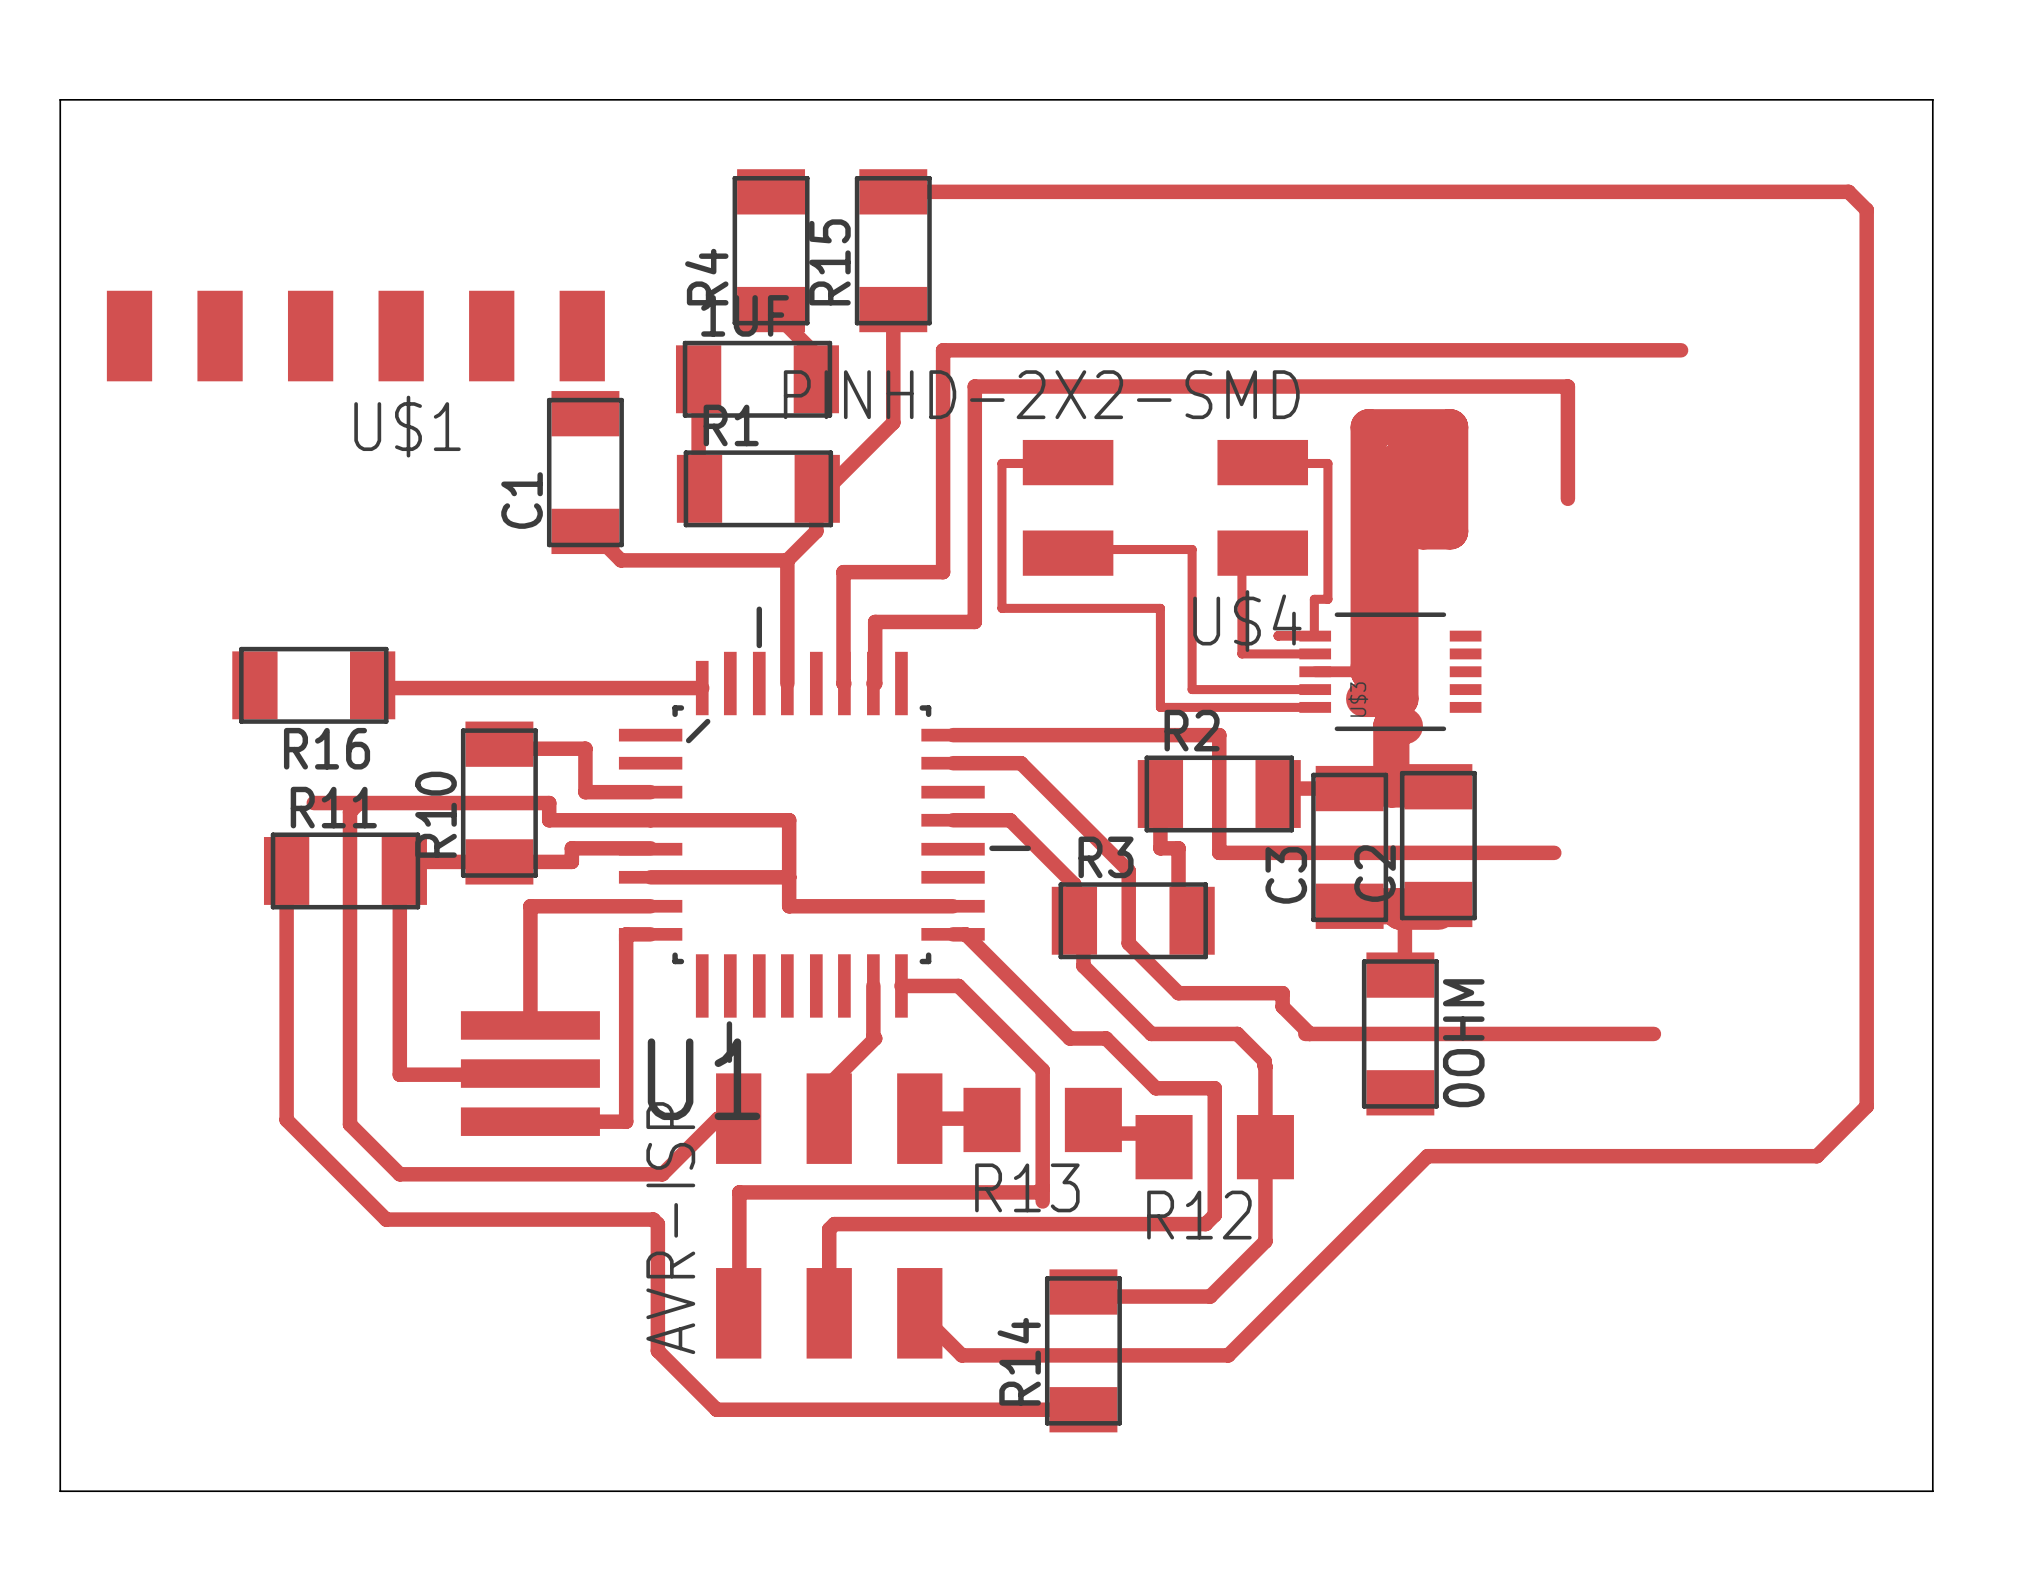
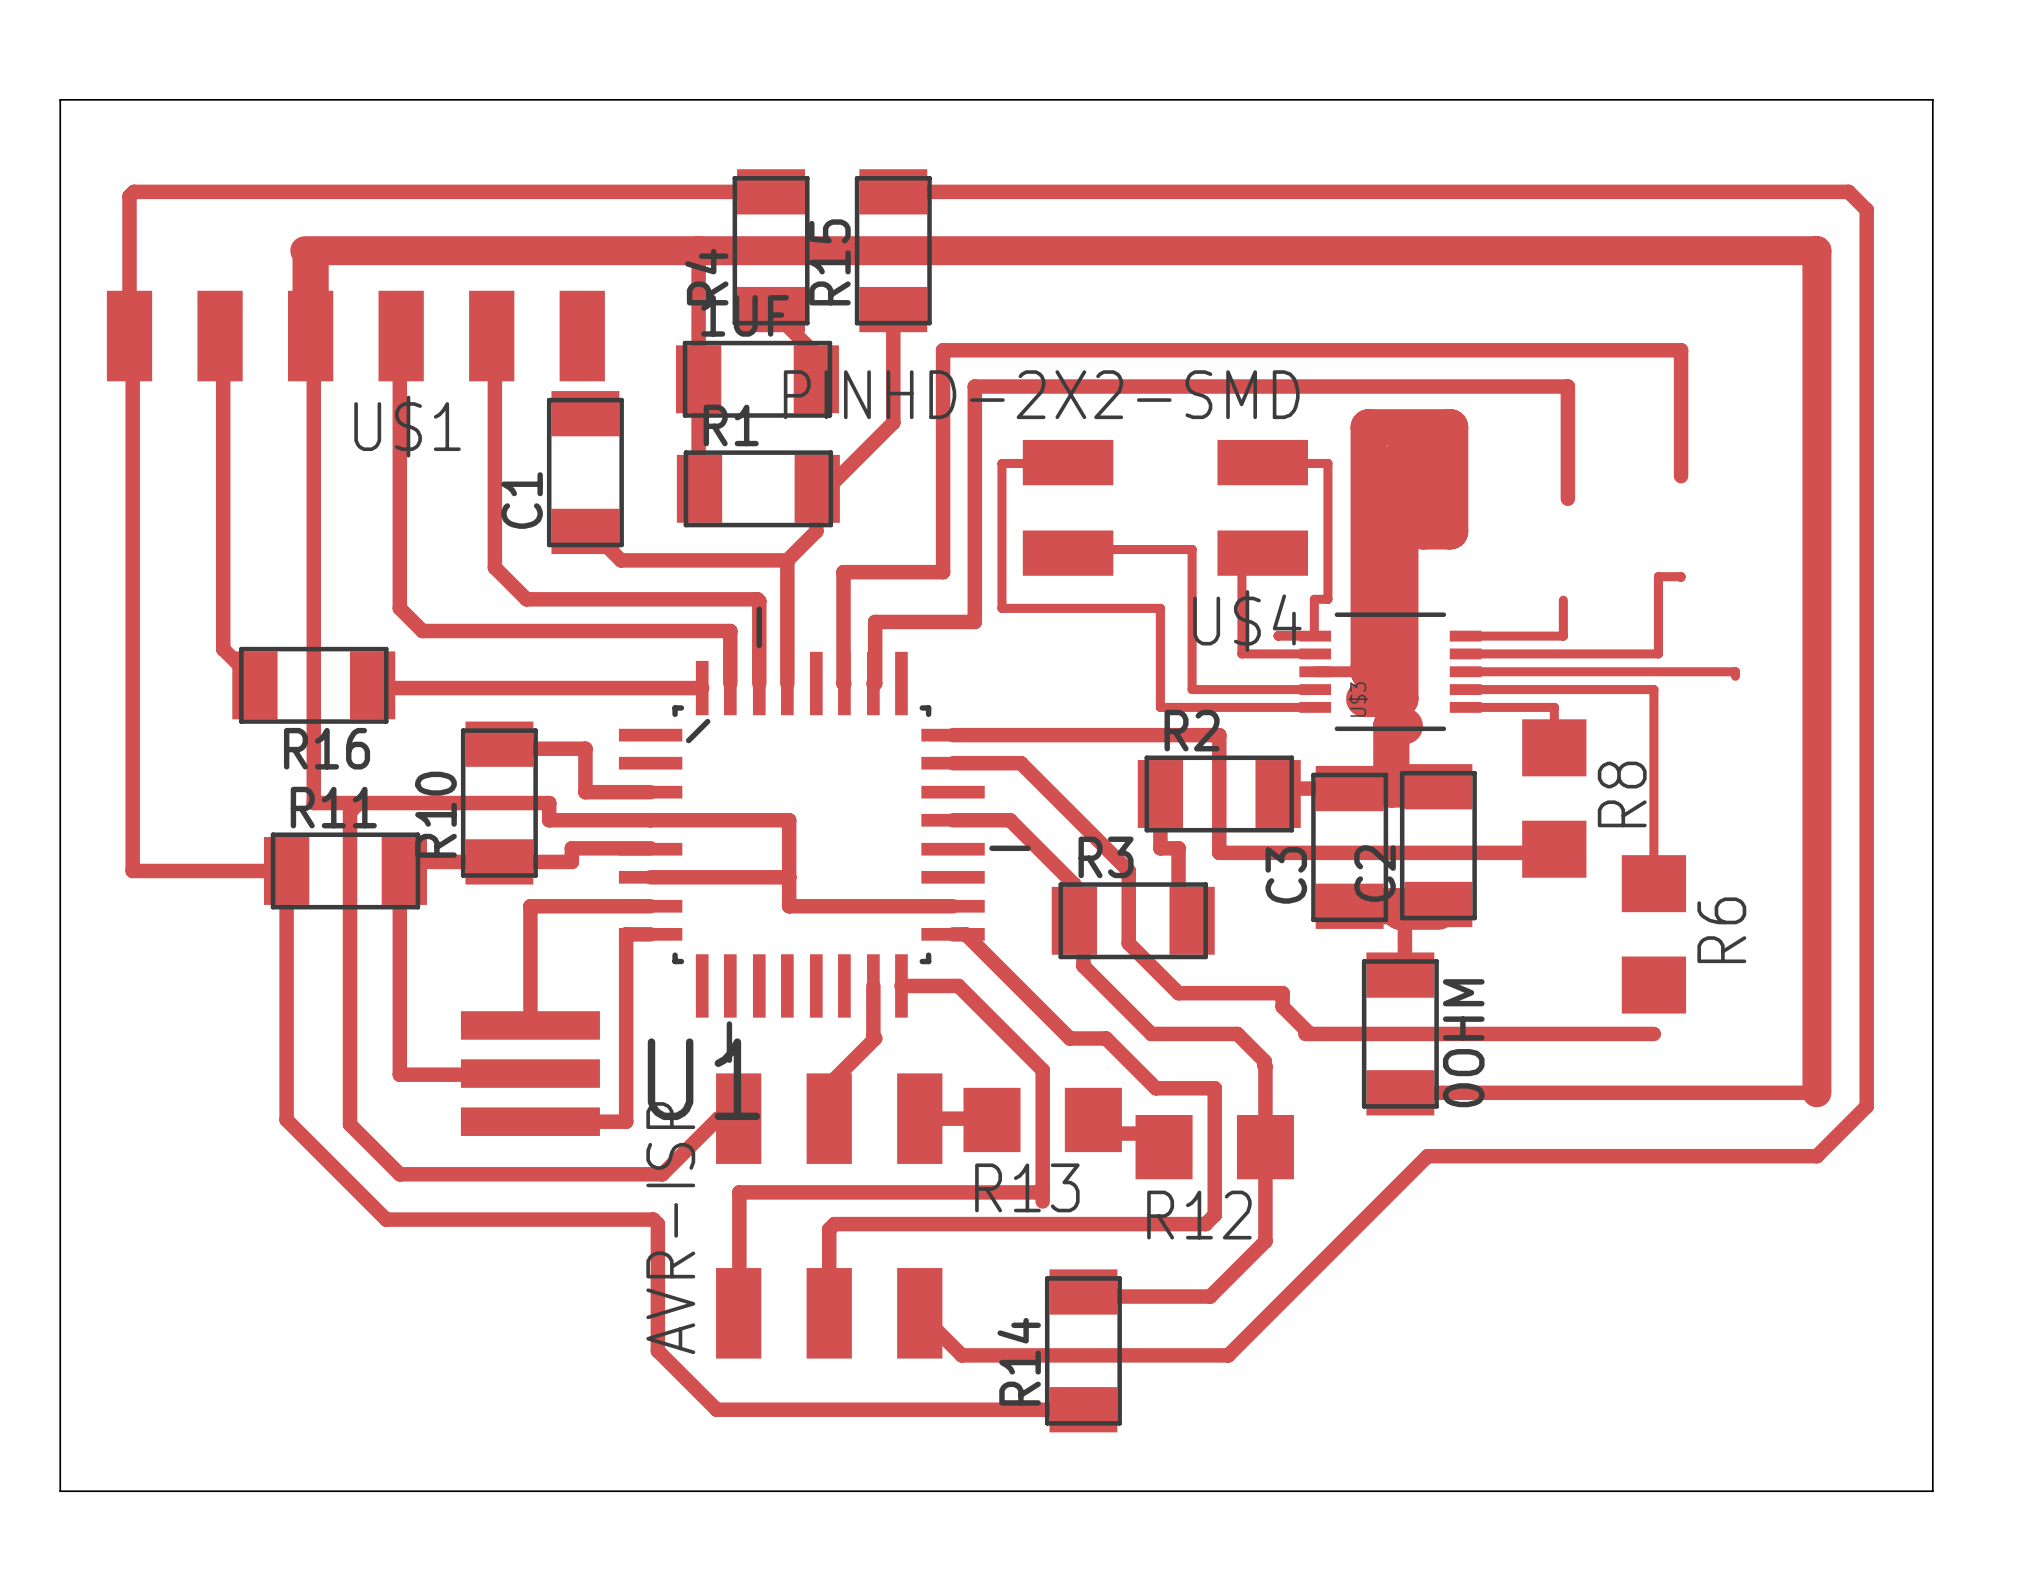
track: none -> (771, 191) (134, 191) (129, 196) (129, 336) (132, 339) (132, 870) (271, 870)
track: none -> (698, 250) (698, 379)
track: none -> (220, 336) (223, 339) (223, 649) (254, 680) (254, 685)
track: none -> (399, 337) (399, 608) (422, 631) (730, 631) (730, 683)
track: none -> (494, 339) (494, 567) (526, 599) (757, 599) (759, 601) (759, 683)
track: none -> (1681, 350) (1681, 476)
track: none -> (1681, 577) (1658, 576) (1658, 653) (1465, 653)
track: none -> (1563, 600) (1563, 636) (1465, 636)
track: none -> (1465, 671) (1735, 671) (1735, 676)
track: none -> (1465, 689) (1653, 689) (1653, 883)
track: none -> (1465, 707) (1554, 707) (1554, 747)
R8: none -> (1554, 798)
track: none -> (313, 803) (313, 339) (310, 336) (310, 256) (304, 250) (1816, 250) (1816, 1092) (1400, 1092)
R6: none -> (1653, 934)

